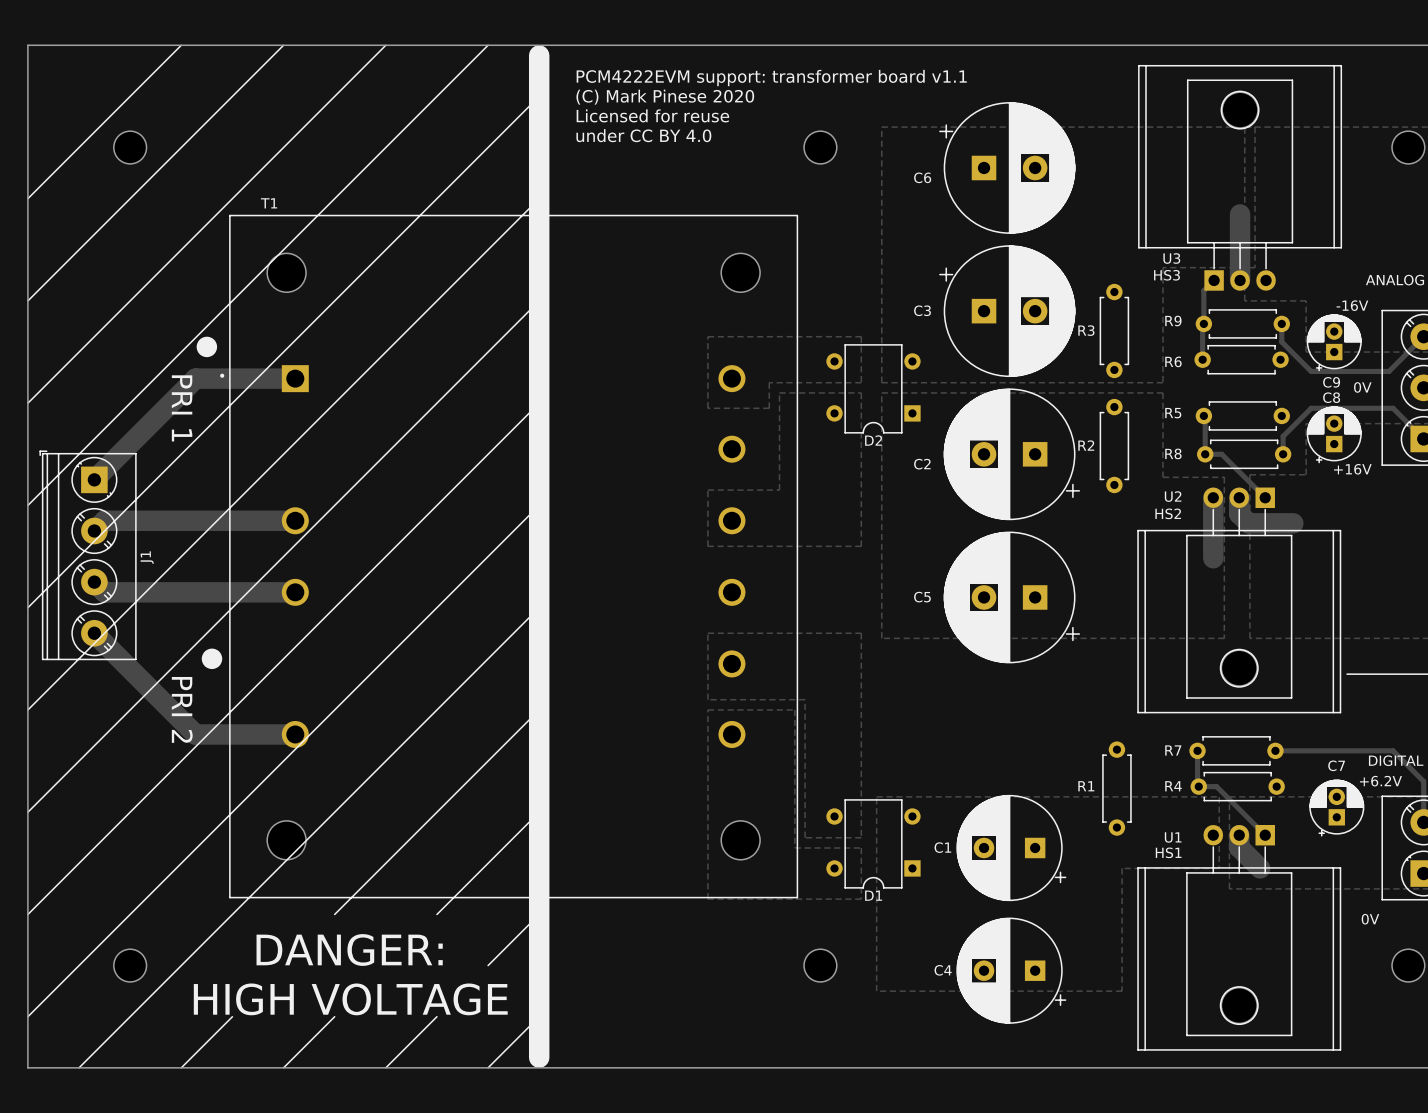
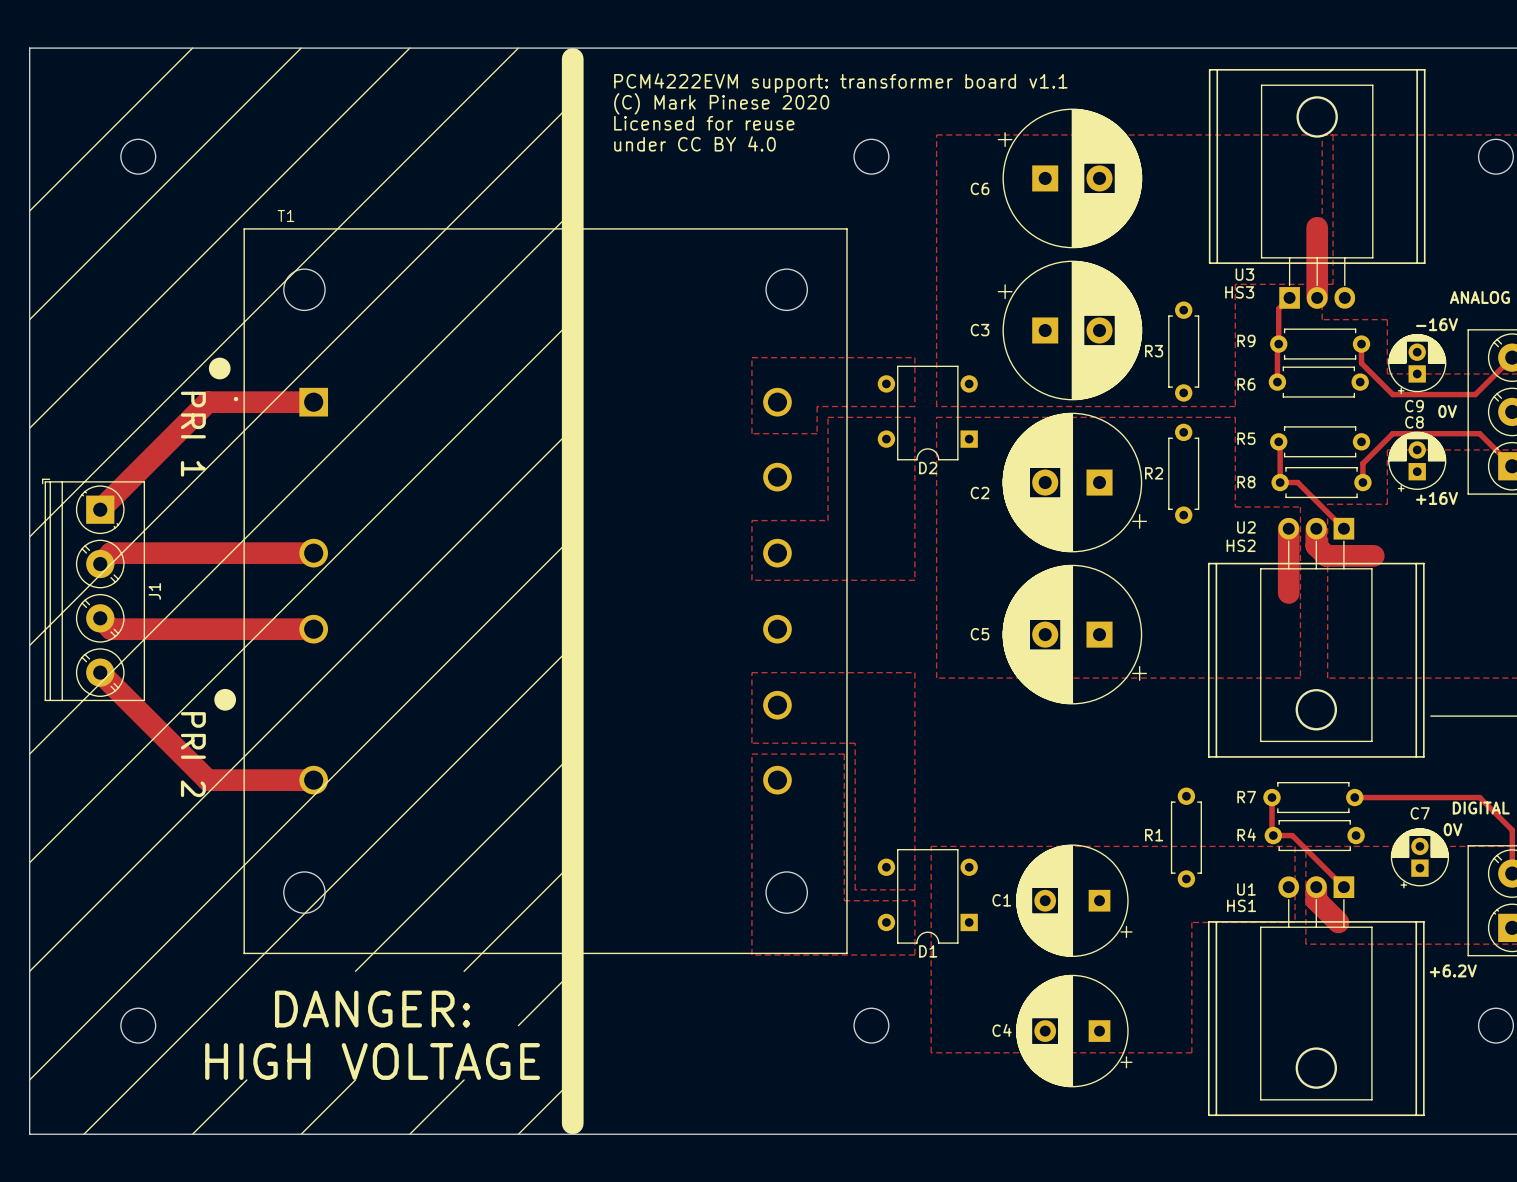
text: none -> 0V (1453, 829)
text: +6.2V (1380, 781) -> none
text: 0V (1370, 919) -> +6.2V (1453, 970)

